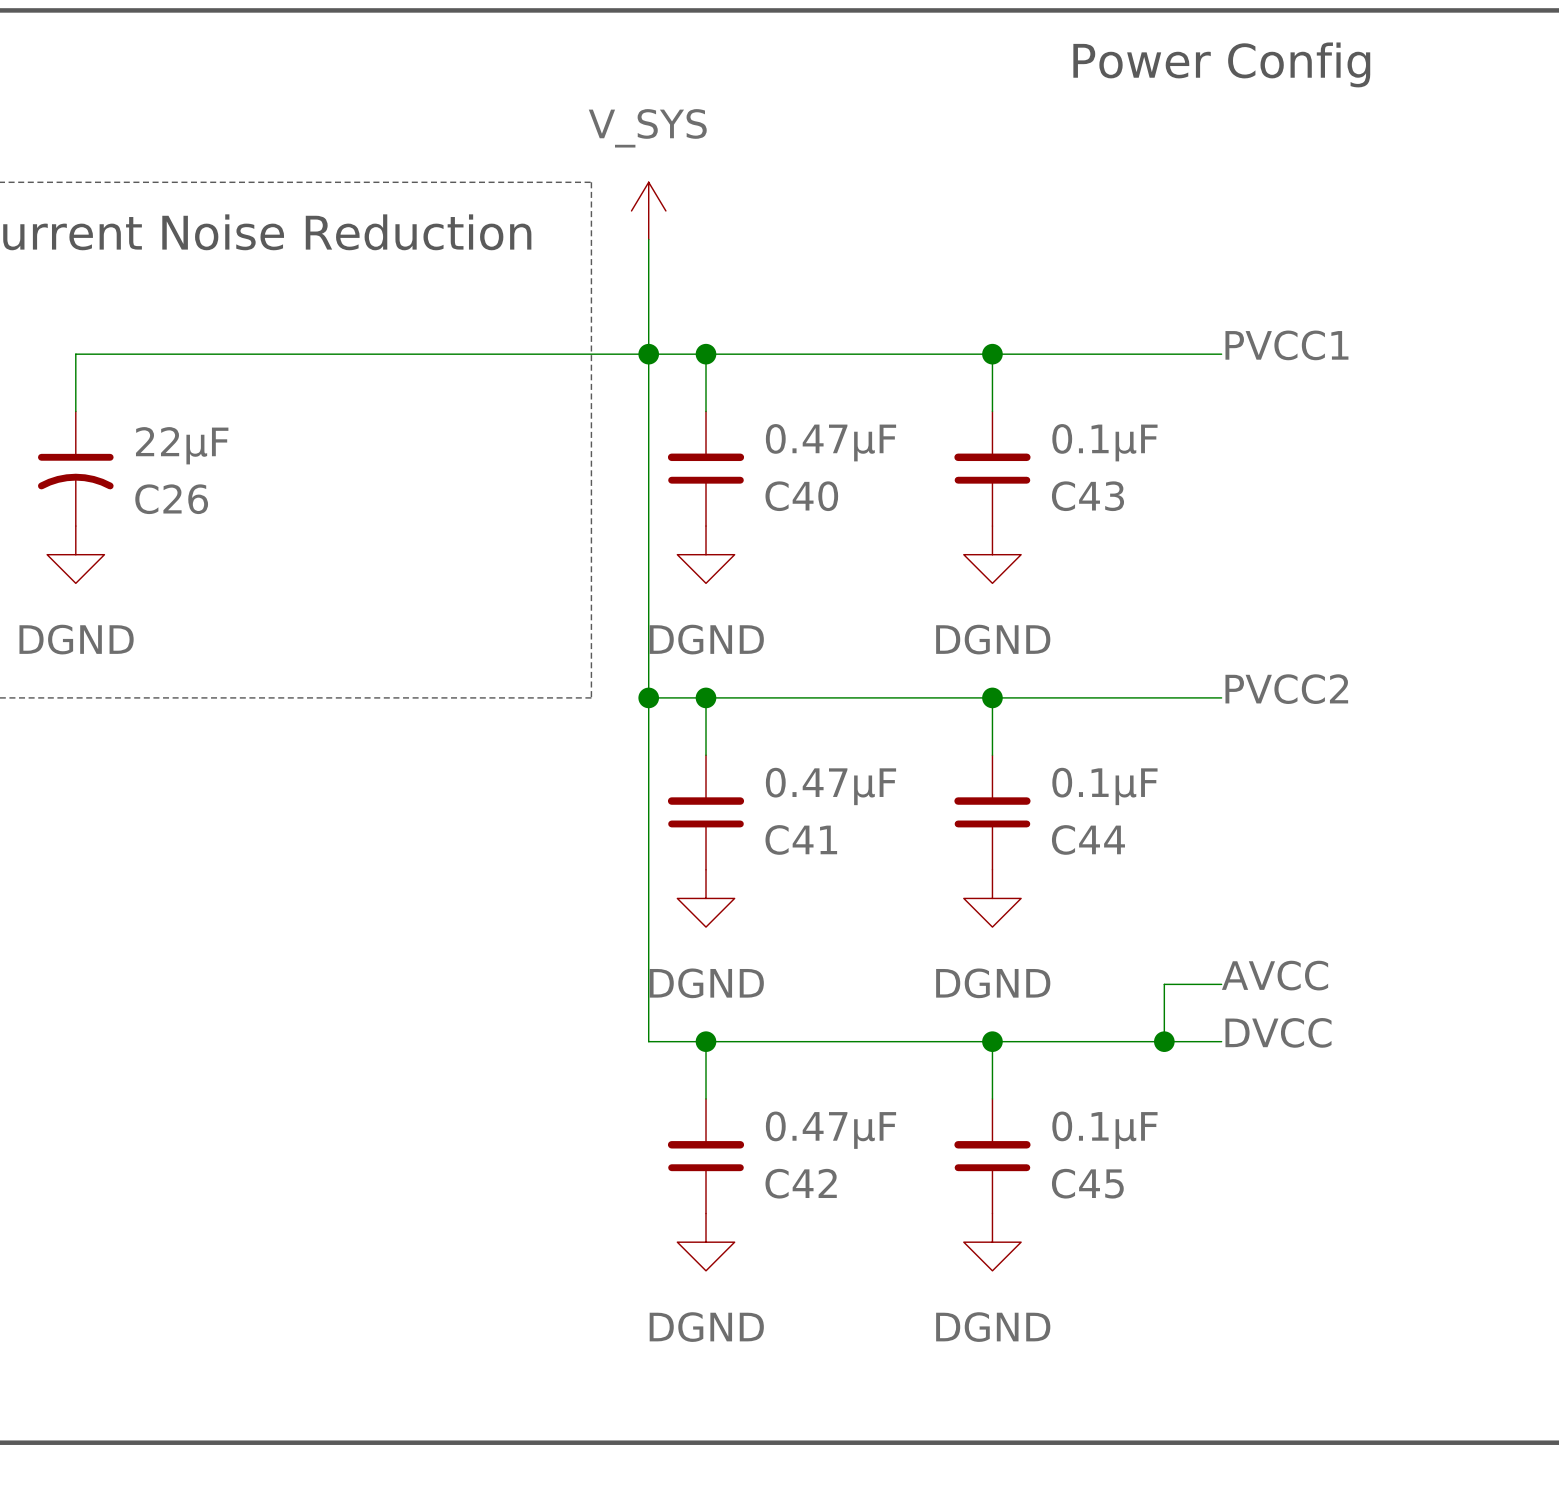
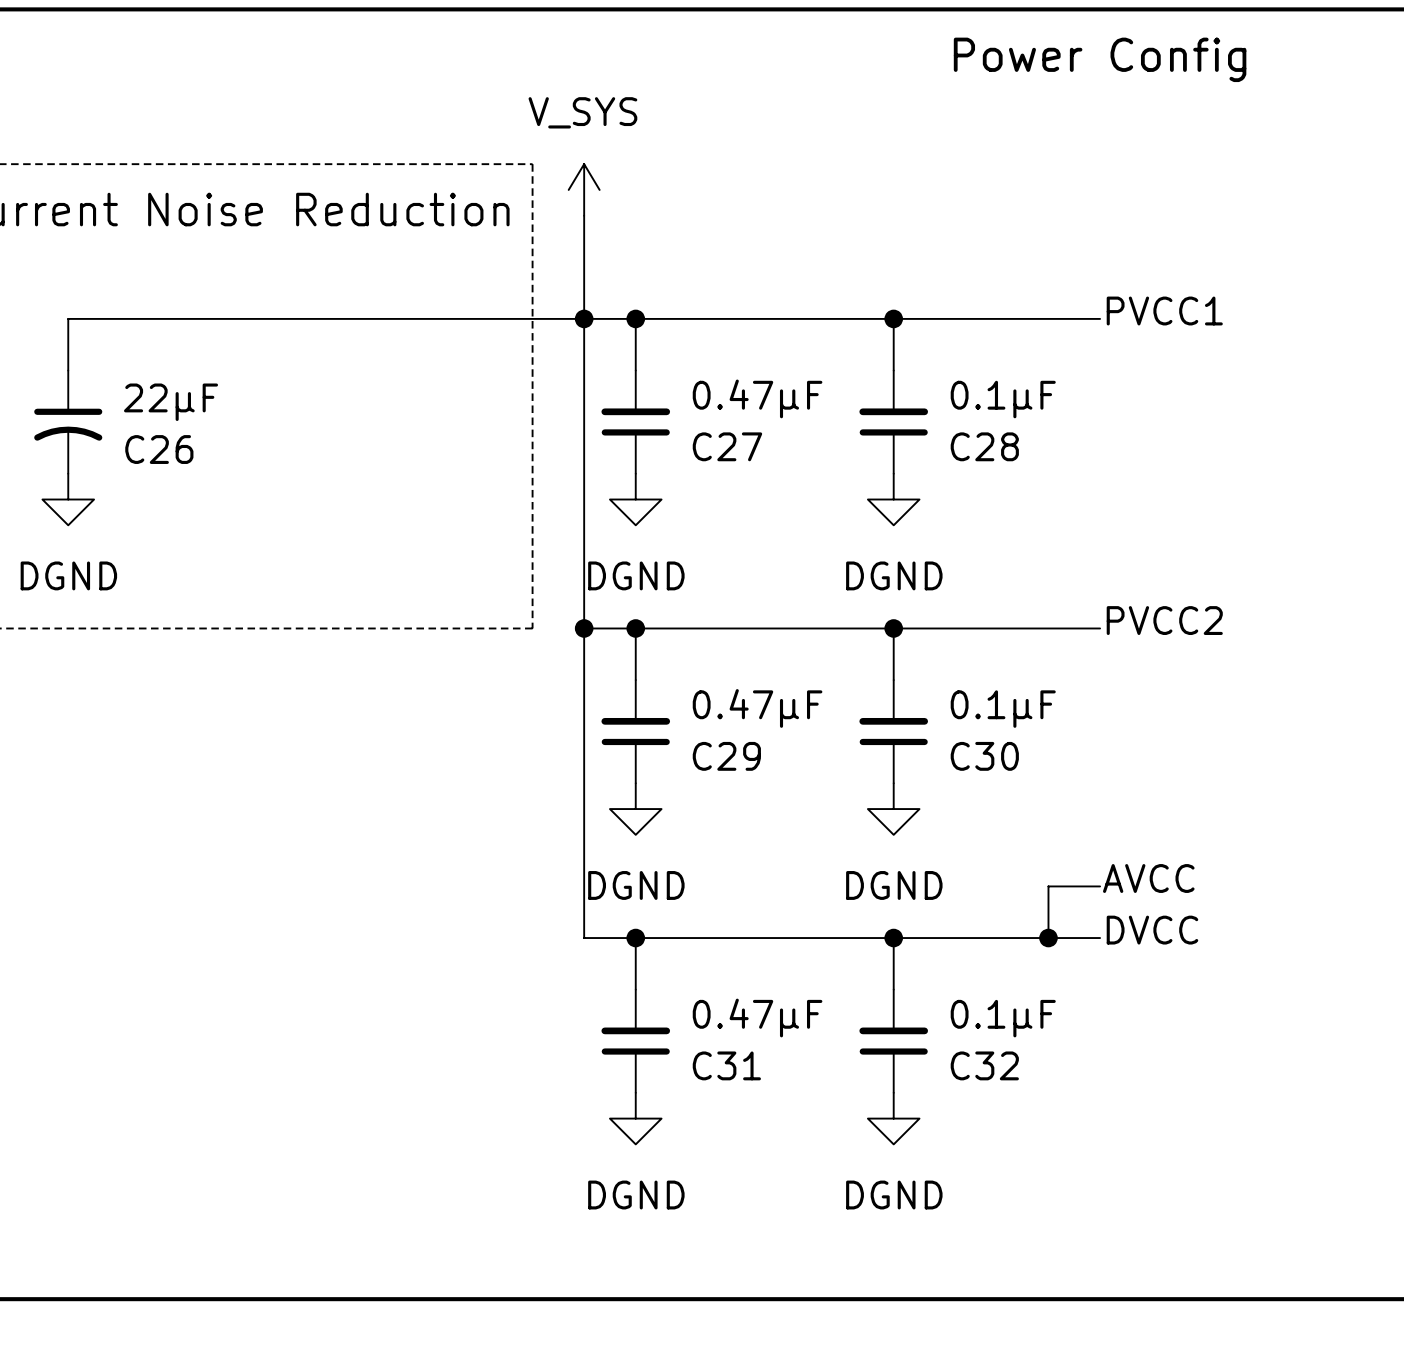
C40 name: C40 (801, 496) -> C27 (727, 446)
C43 name: C43 (1087, 496) -> C28 (984, 446)
C41 name: C41 (801, 839) -> C29 (726, 756)
C44 name: C44 (1088, 839) -> C30 (984, 756)
C42 name: C42 (801, 1183) -> C31 (726, 1065)
C45 name: C45 (1087, 1183) -> C32 (984, 1065)

